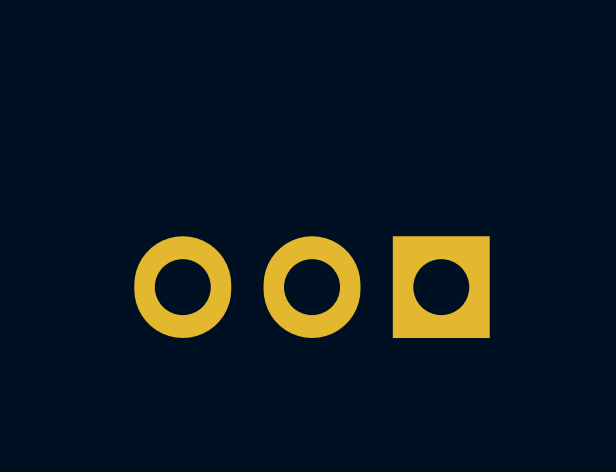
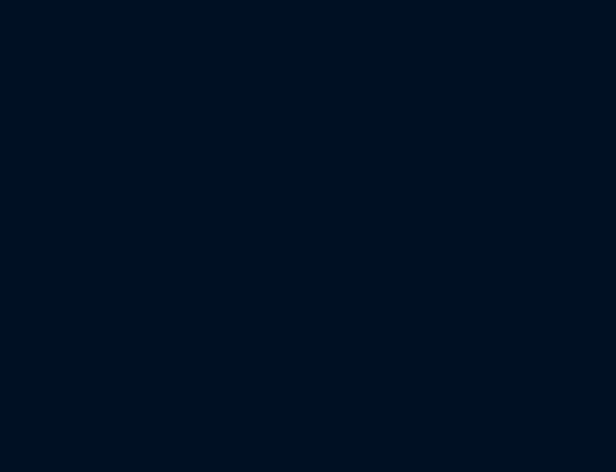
part: (312, 287) -> none

